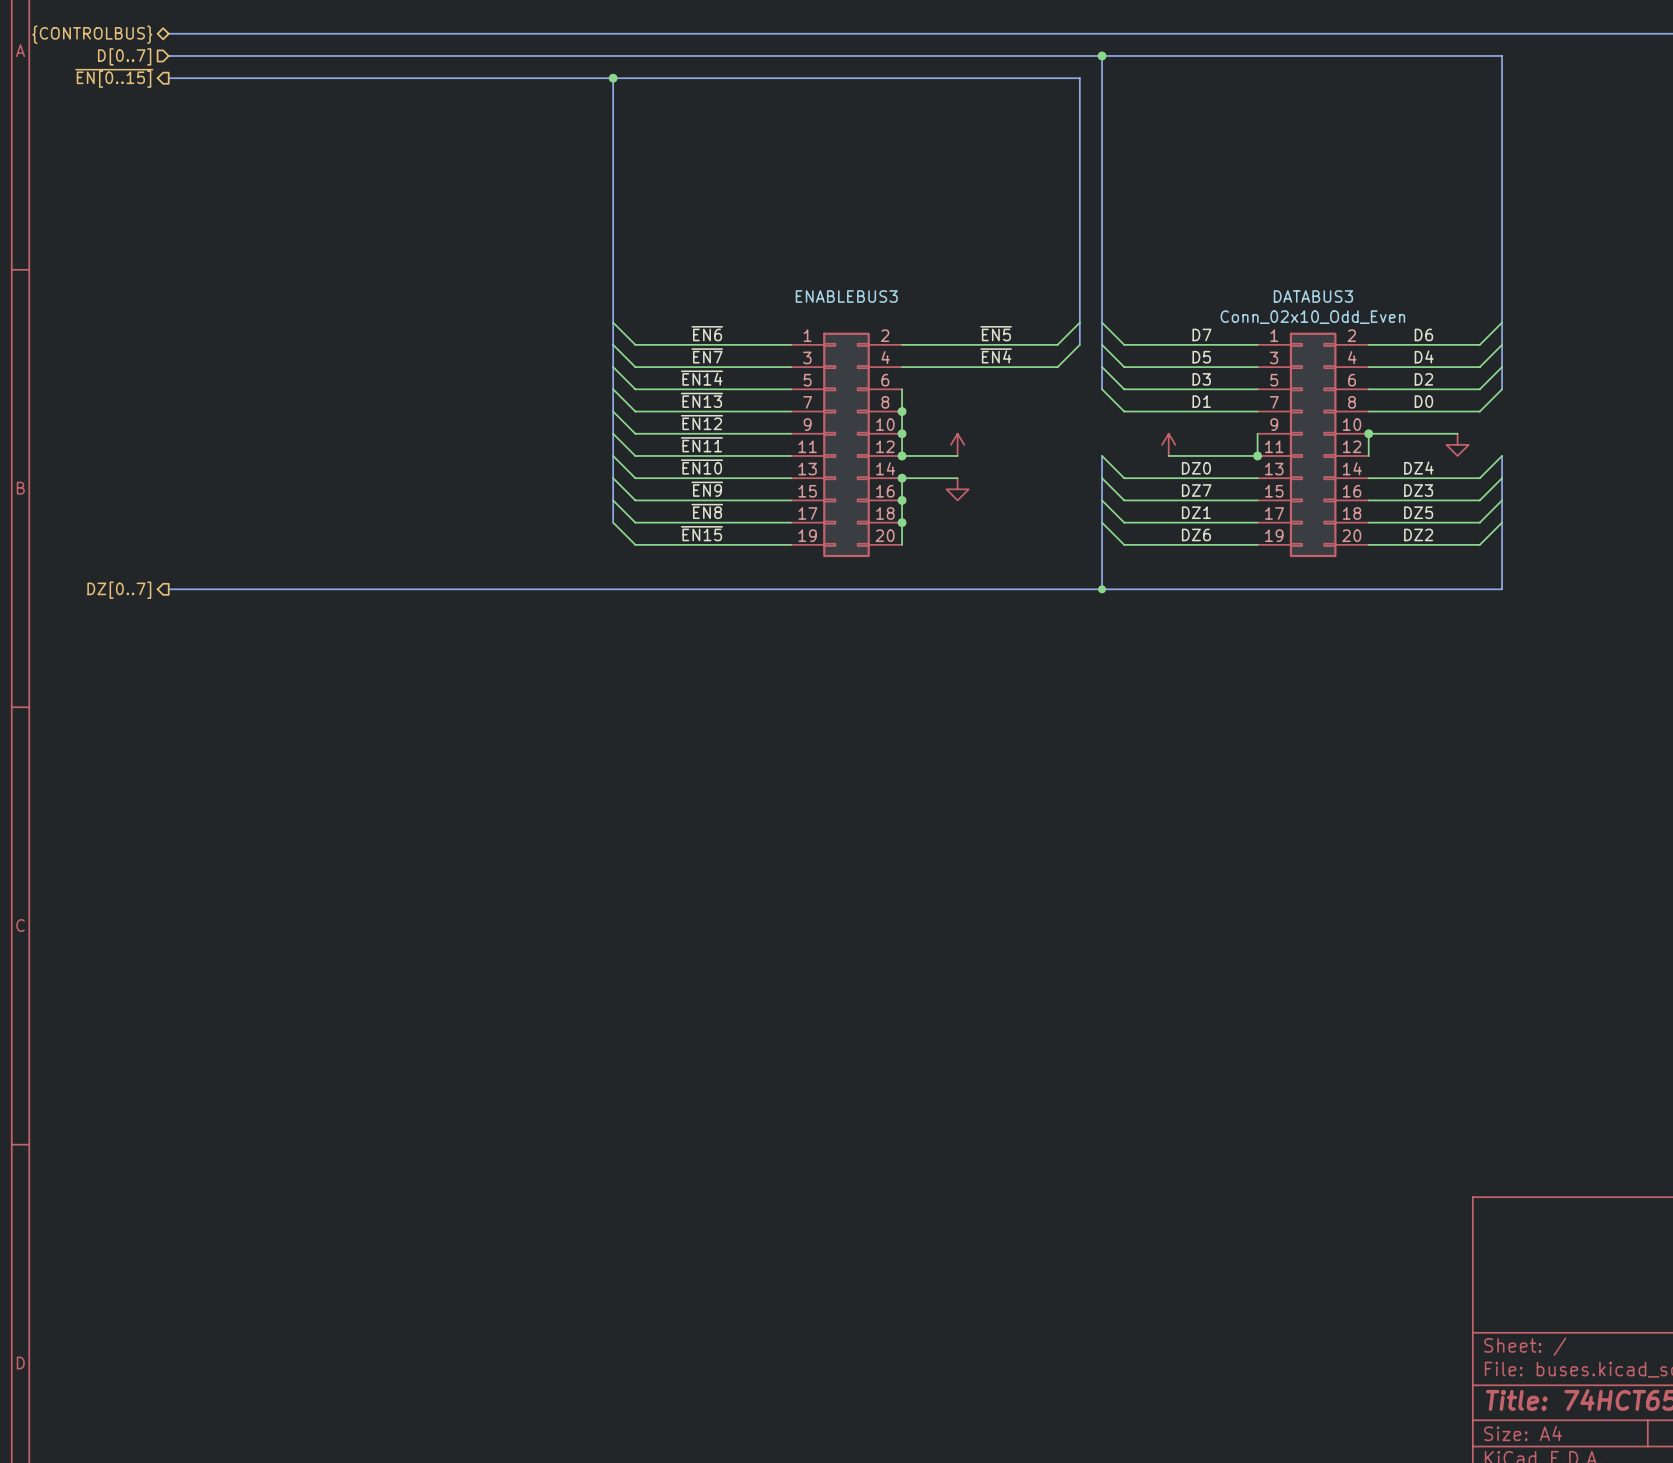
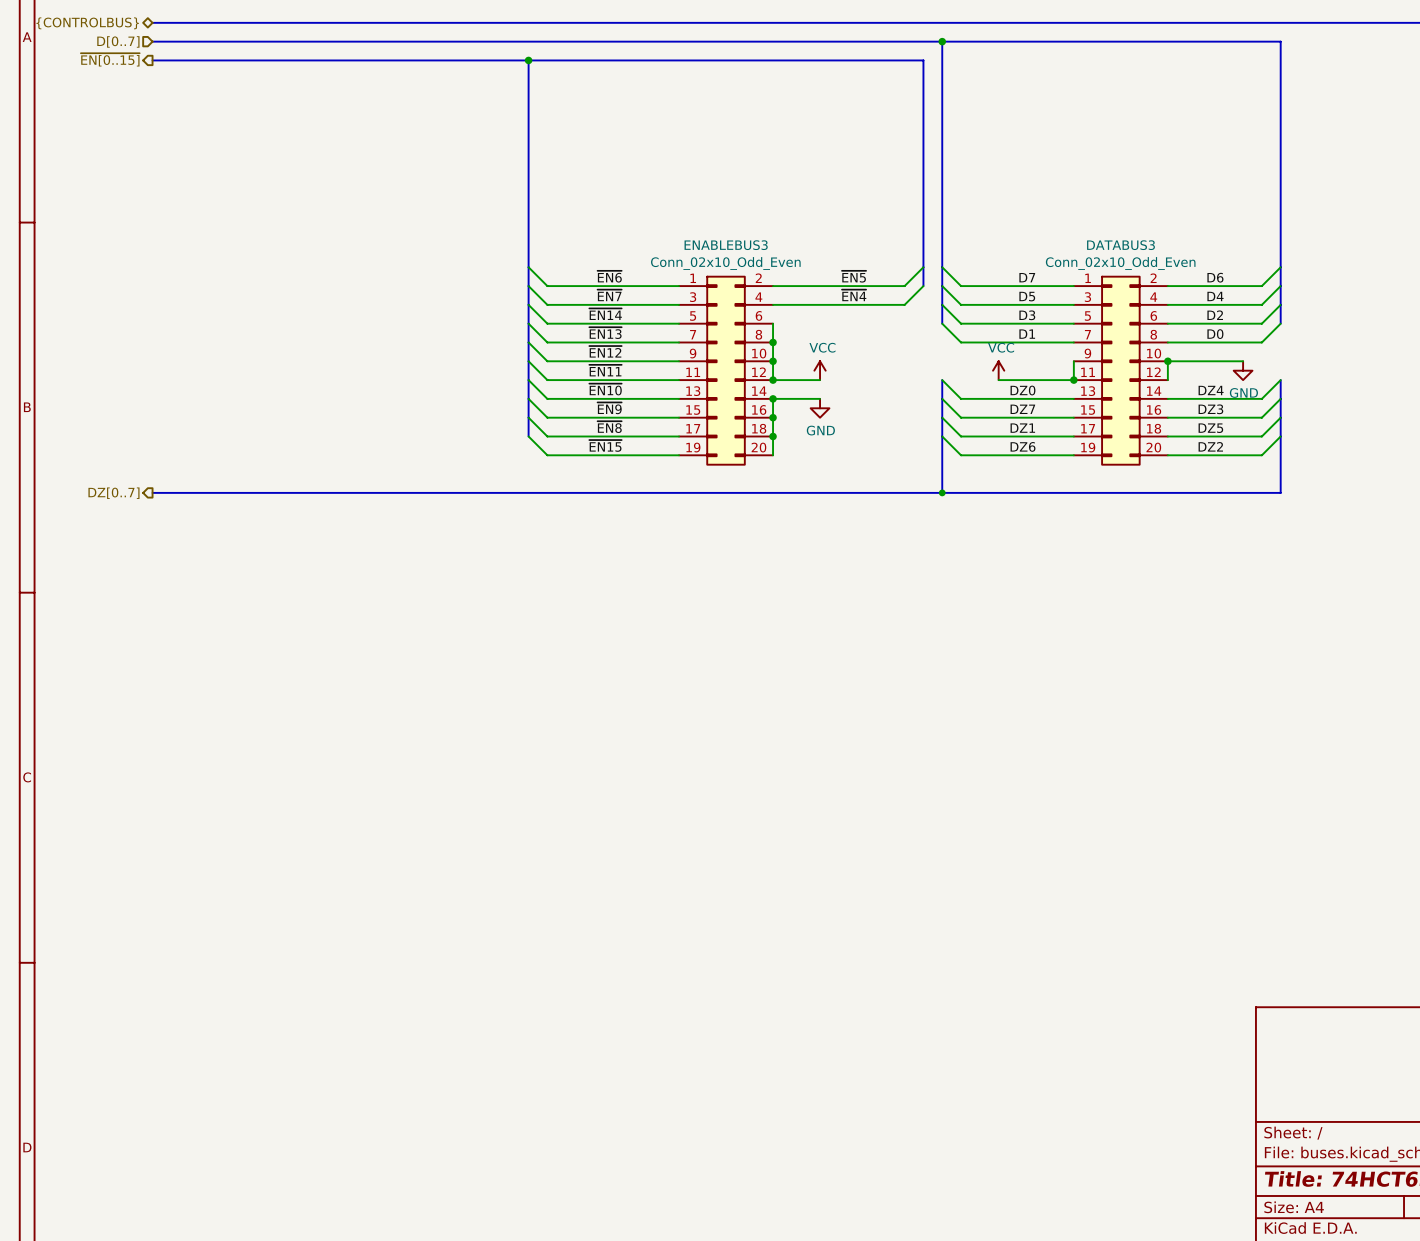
ENABLEBUS3 value: none -> Conn_02x10_Odd_Even (725, 263)
power symbol text: none -> VCC (822, 347)
power symbol text: none -> VCC (1001, 347)
power symbol text: none -> GND (1243, 392)
power symbol text: none -> GND (820, 430)

